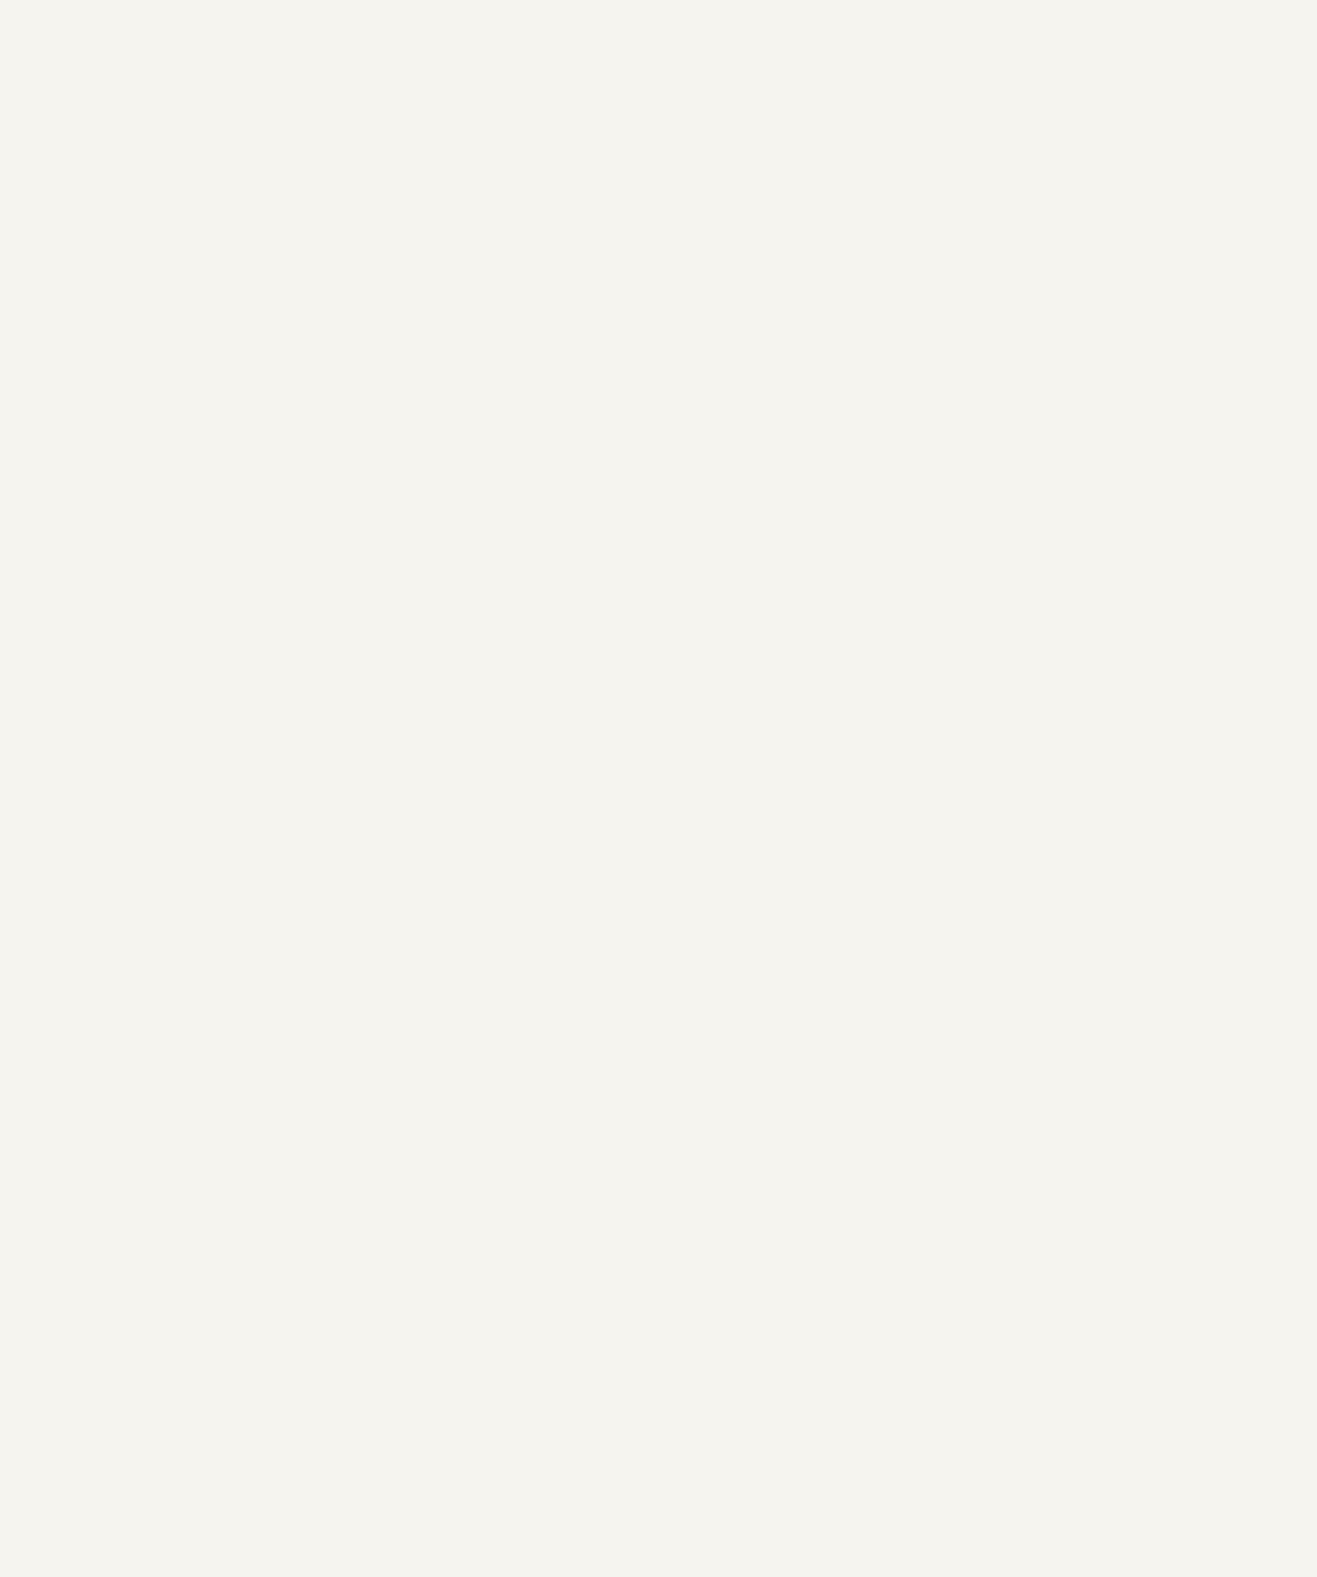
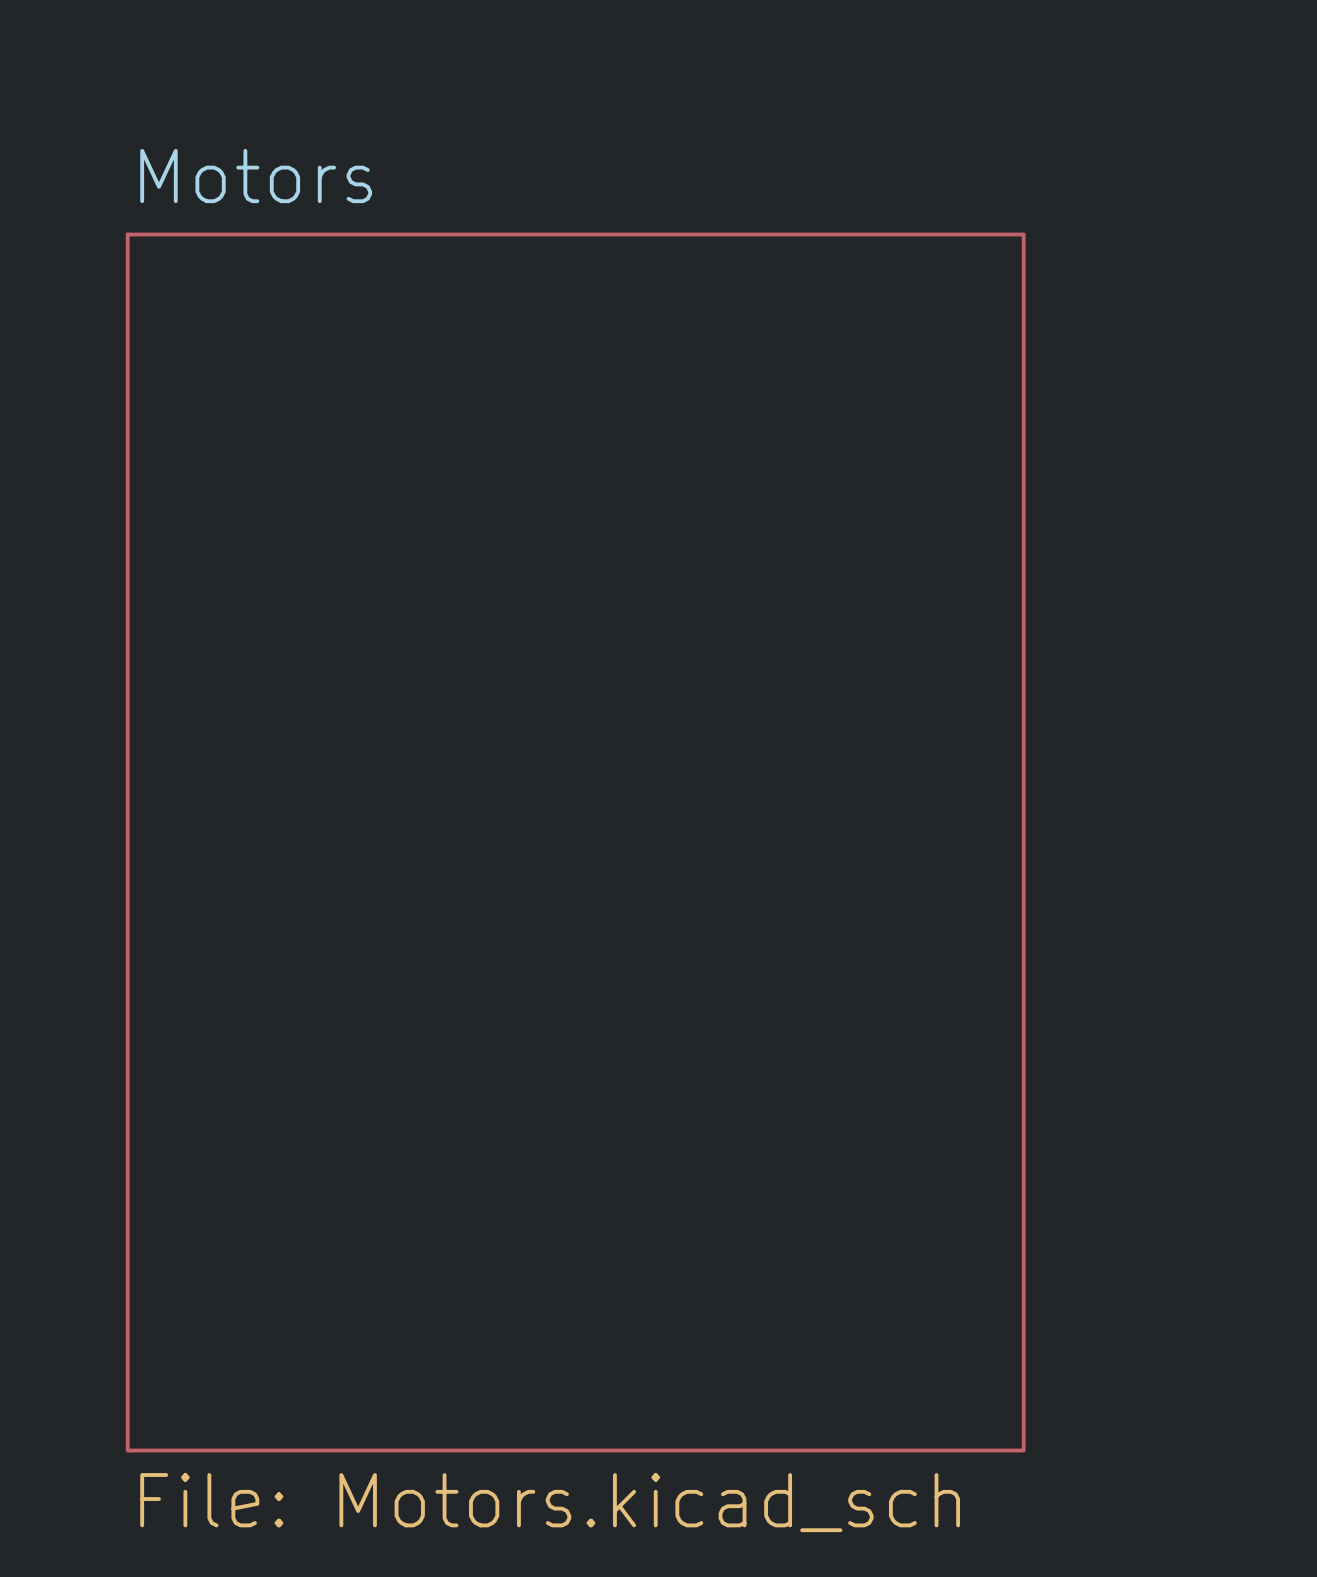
sheet Motors: none -> File: Motors.kicad_sch (575, 842)

